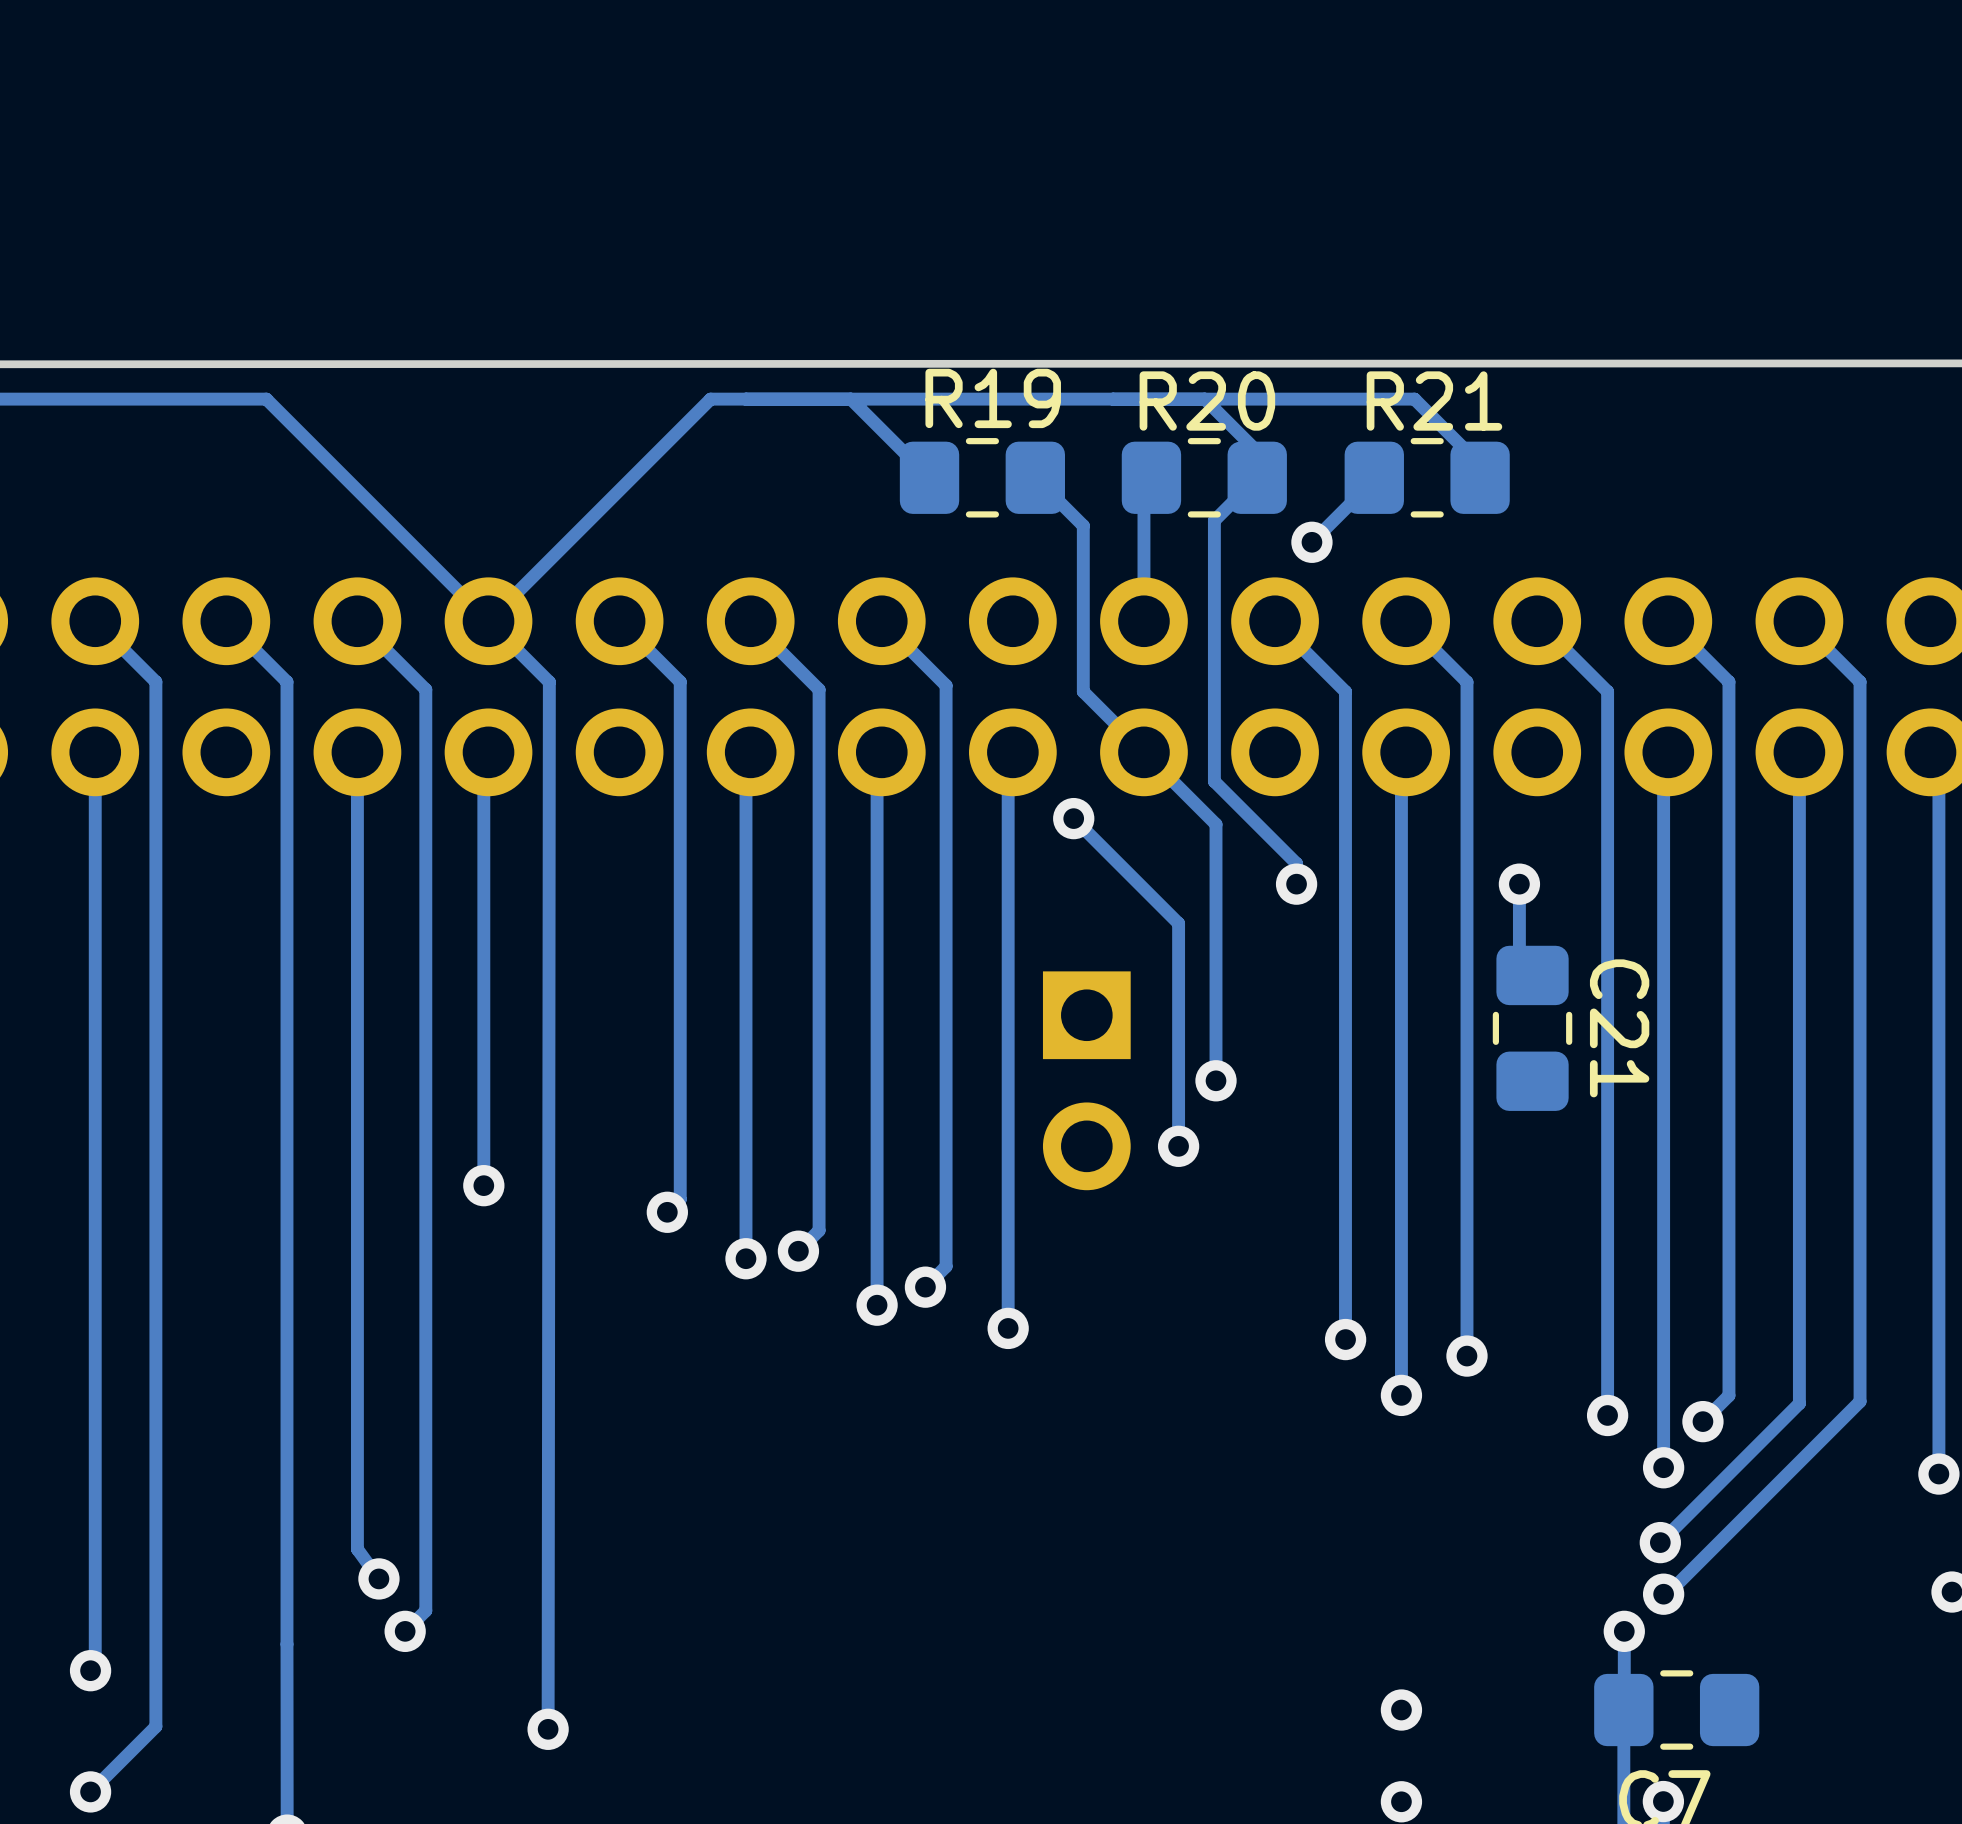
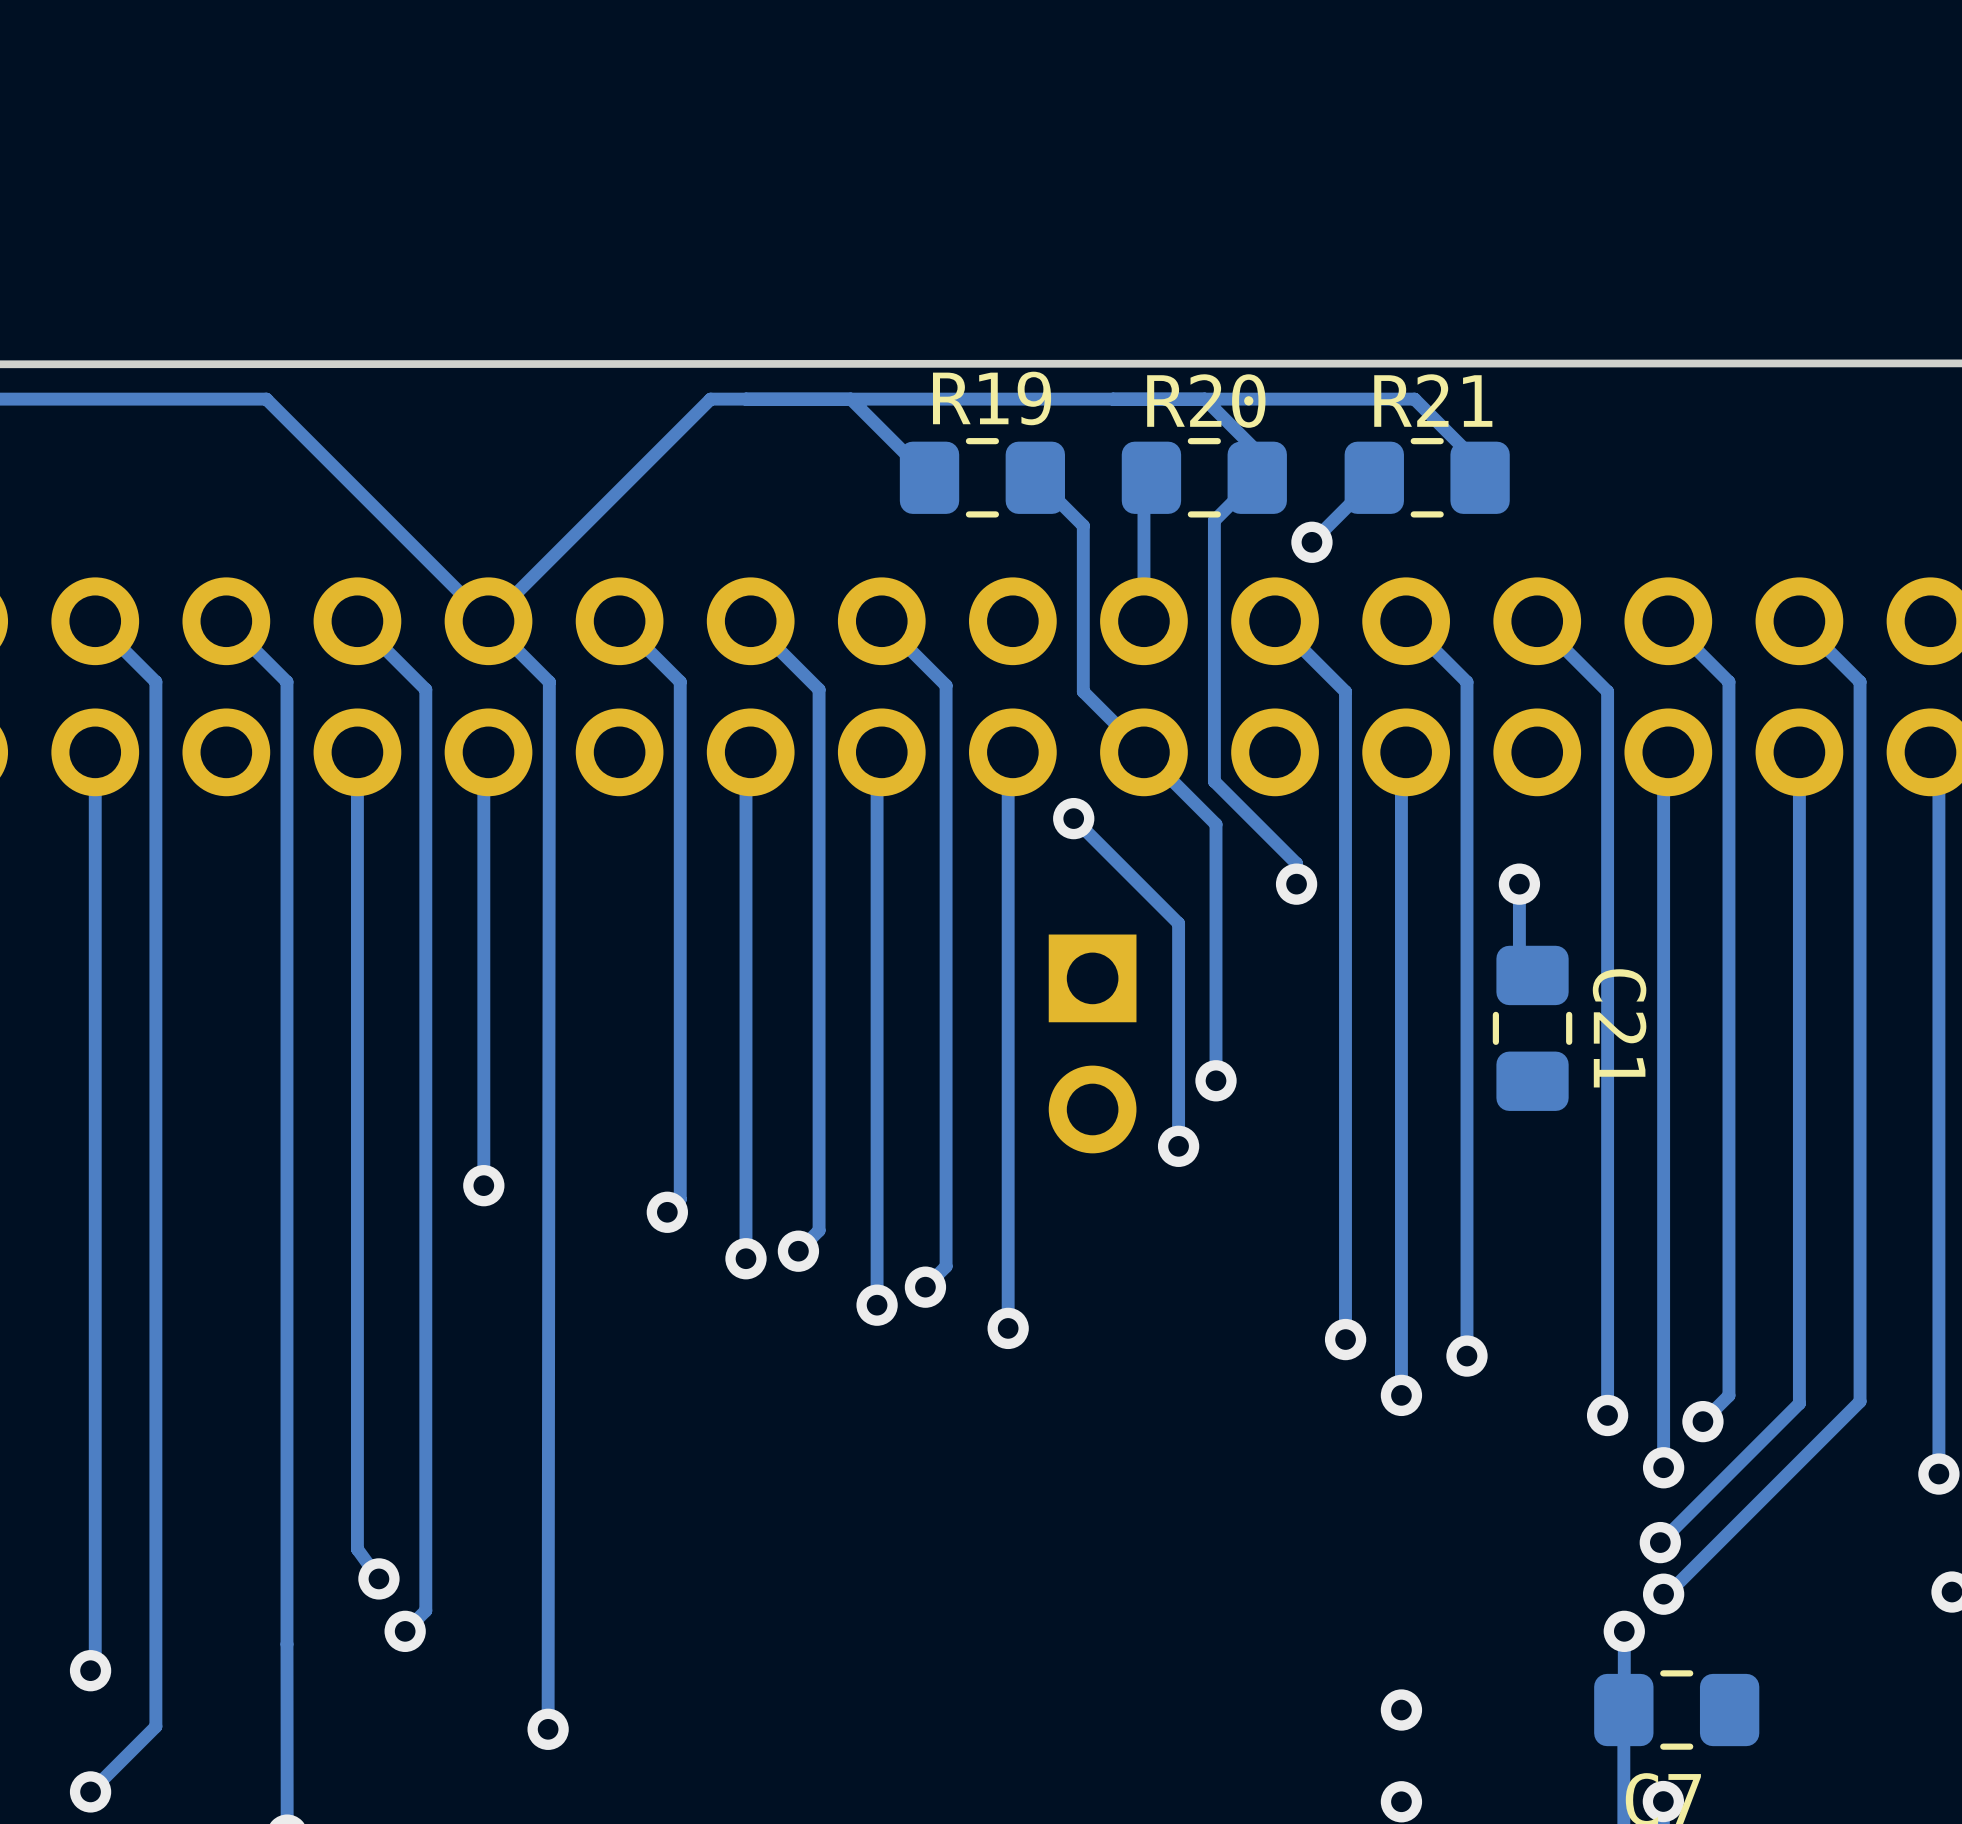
part position: (1086, 1080) -> (1092, 1043)

